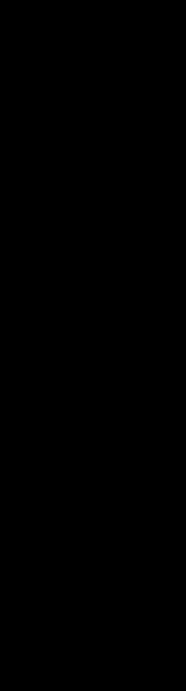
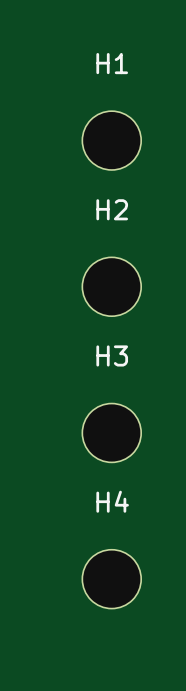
H1: none -> (111, 140)
H2: none -> (111, 286)
H3: none -> (111, 432)
H4: none -> (111, 579)

